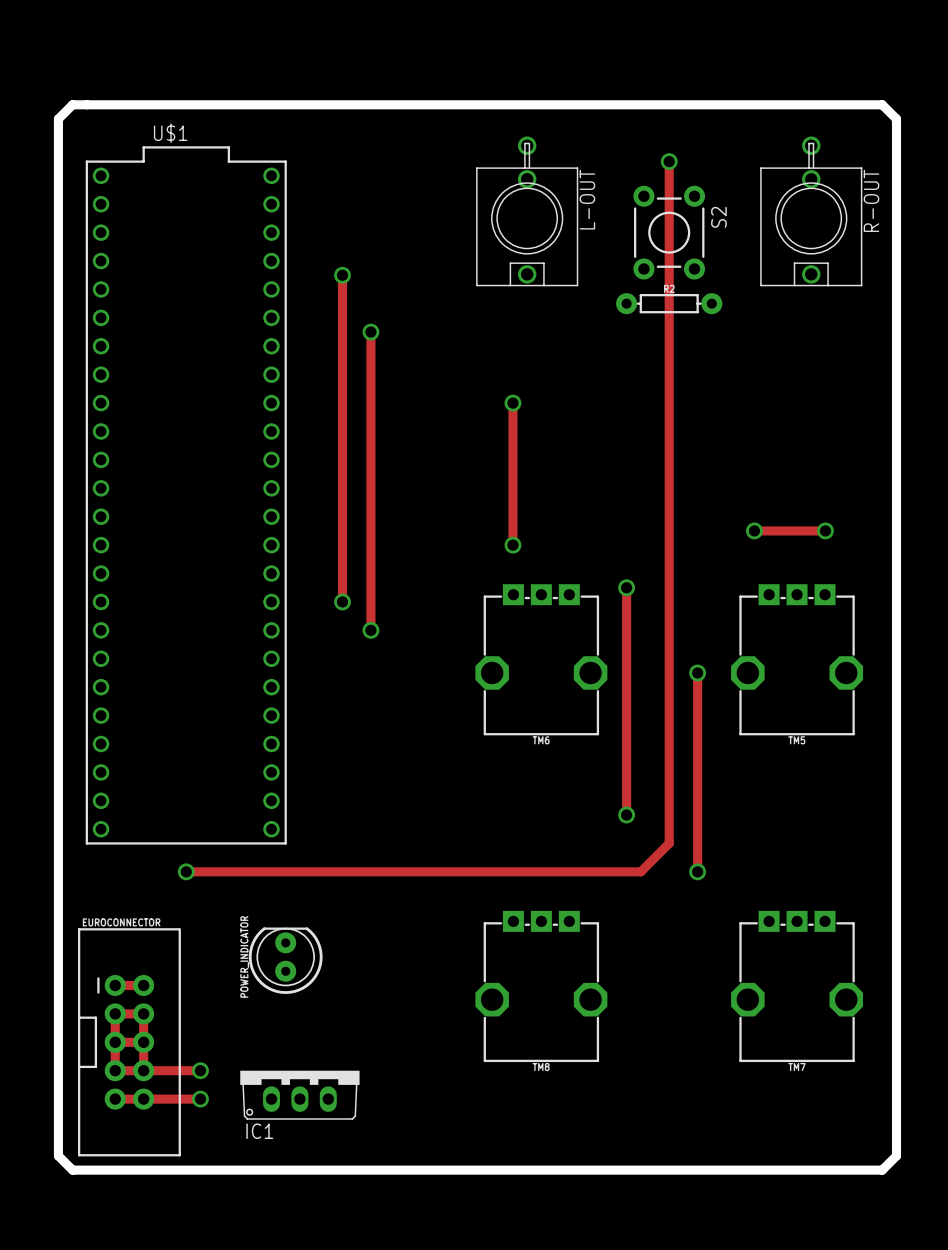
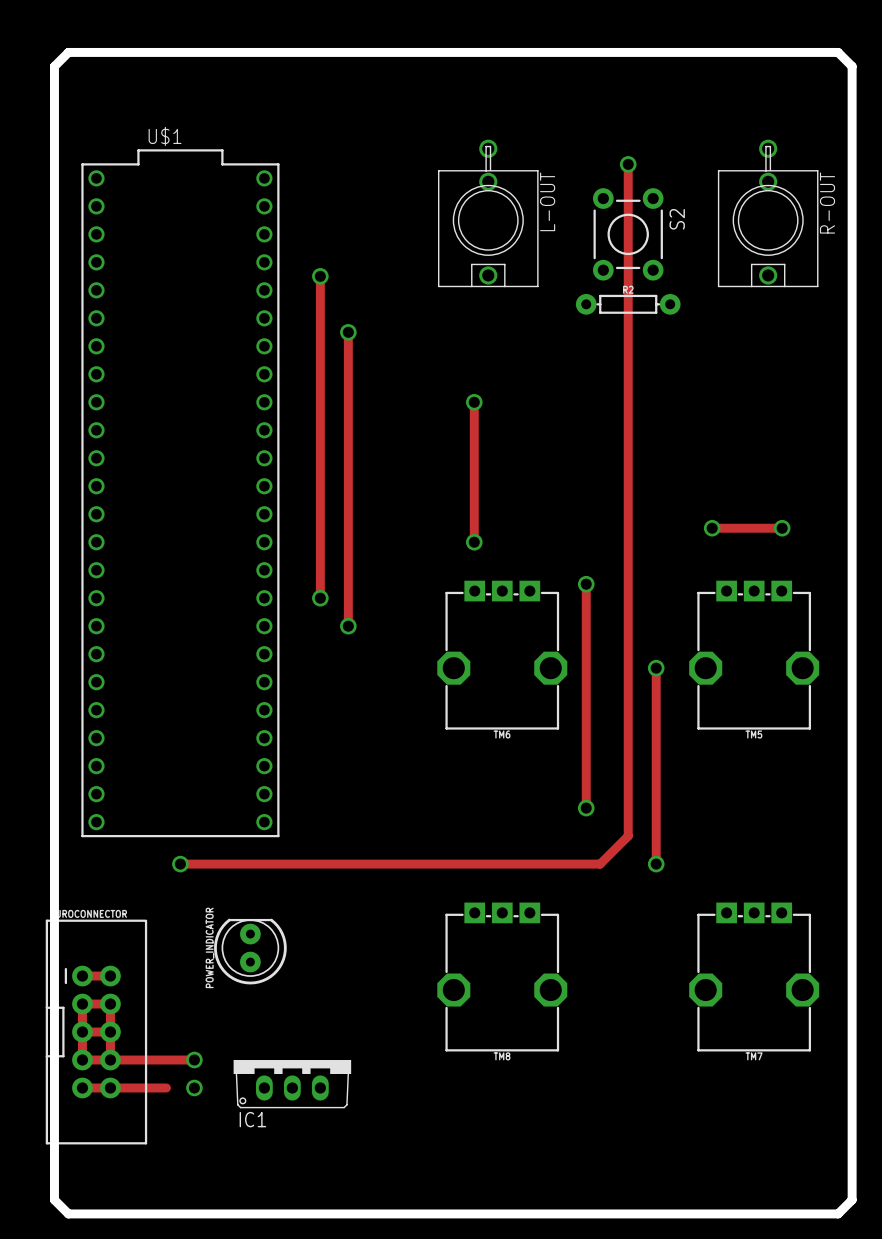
board edge: (896, 119) (882, 104) (72, 104) (58, 119) (58, 1155) (72, 1170) (882, 1170) (896, 1155) -> (852, 122) (852, 66) (838, 52) (68, 52) (54, 66) (54, 1199) (68, 1213) (838, 1213) (852, 1199) (852, 1143)
track: (342, 275) (342, 601) -> (320, 276) (320, 598)
via position: (342, 275) -> (320, 276)
track: (370, 332) (370, 630) -> (348, 332) (348, 626)
via position: (370, 332) -> (348, 332)
U$1 position: (186, 495) -> (180, 493)
via position: (342, 601) -> (320, 598)
via position: (370, 630) -> (348, 626)
track: (186, 871) (214, 871) -> (166, 1060) (194, 1060)
via position: (186, 871) -> (180, 864)
via: (200, 1070) -> none
via: none -> (194, 1060)
IC1 position: (299, 1095) -> (292, 1084)
via: (200, 1099) -> none
via: none -> (194, 1087)

